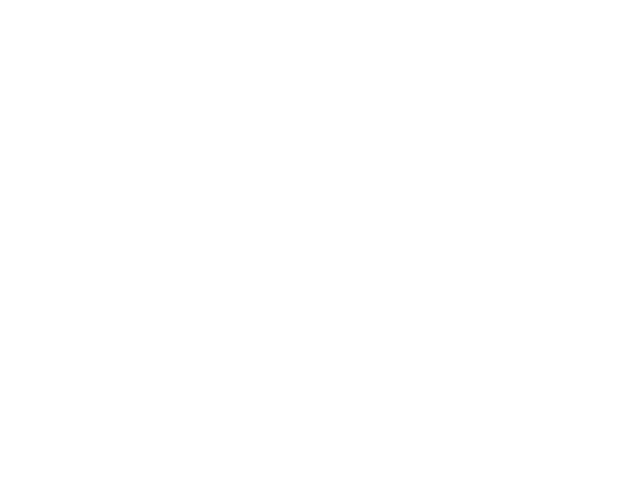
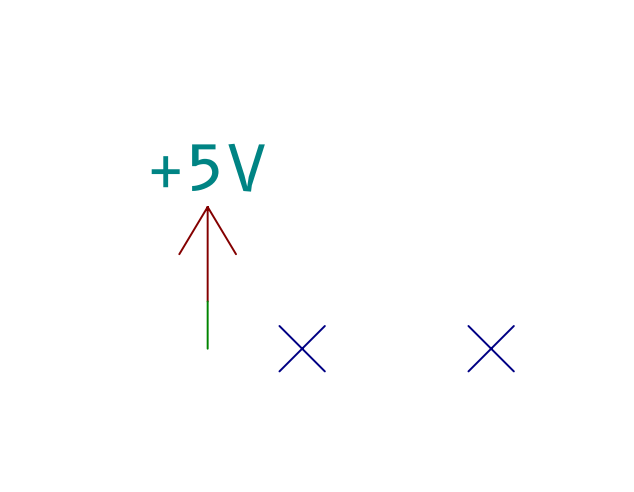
power symbol: none -> +5V (207, 254)
wire: none -> (207, 301) (207, 348)
no-connect mark: none -> (302, 348)
no-connect mark: none -> (491, 348)

